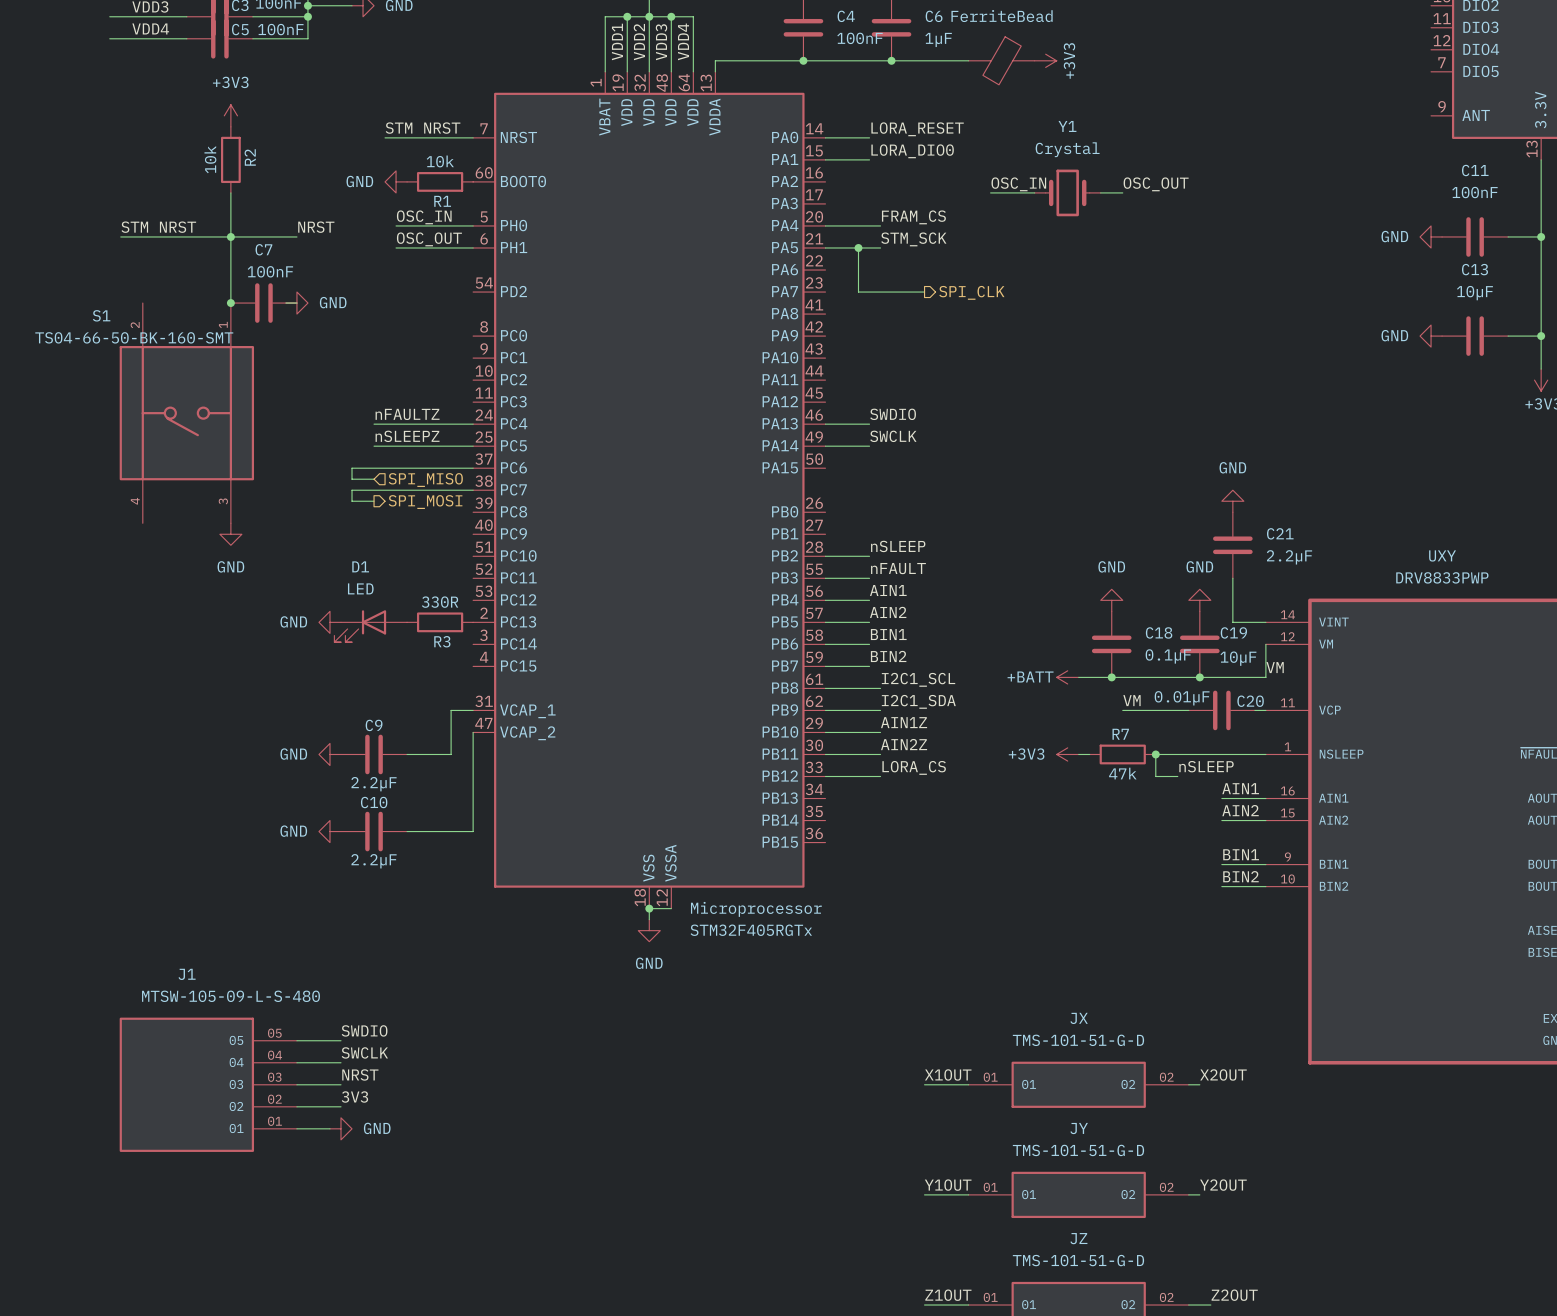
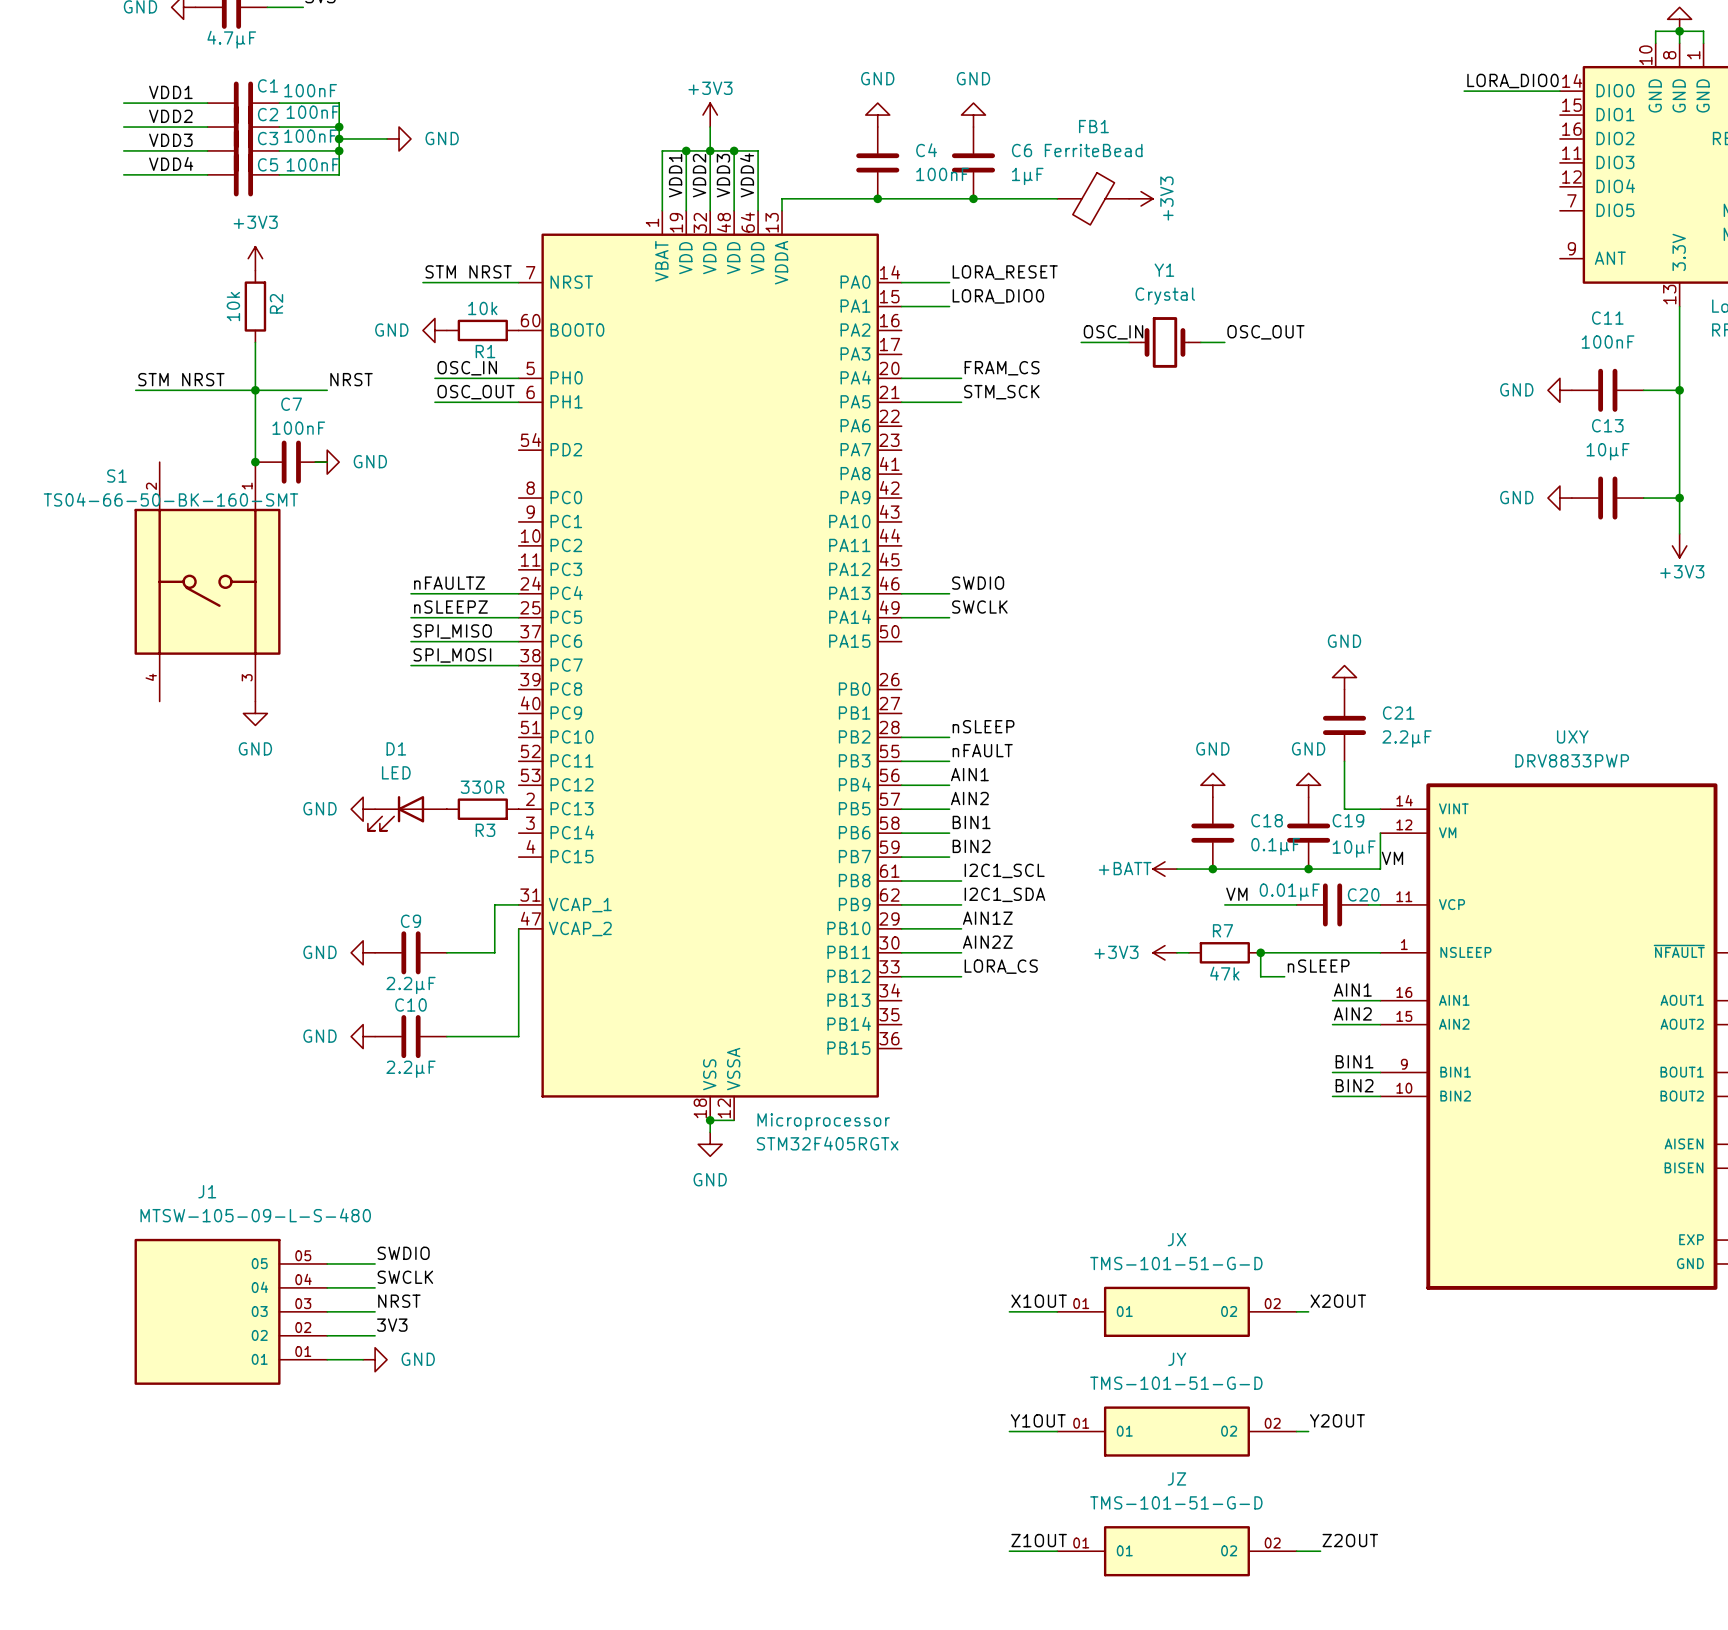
wire: (858, 247) (858, 292) (924, 292) -> none
junction: (858, 247) -> none
hierarchical label: SPI_CLK (971, 292) -> none
label: none -> SPI_MISO (452, 631)
wire: (374, 468) (352, 468) (352, 479) (374, 479) -> none
hierarchical label: SPI_MISO (425, 480) -> none
label: none -> SPI_MOSI (452, 655)
wire: (374, 490) (352, 490) (352, 501) (374, 501) -> none
hierarchical label: SPI_MOSI (425, 502) -> none

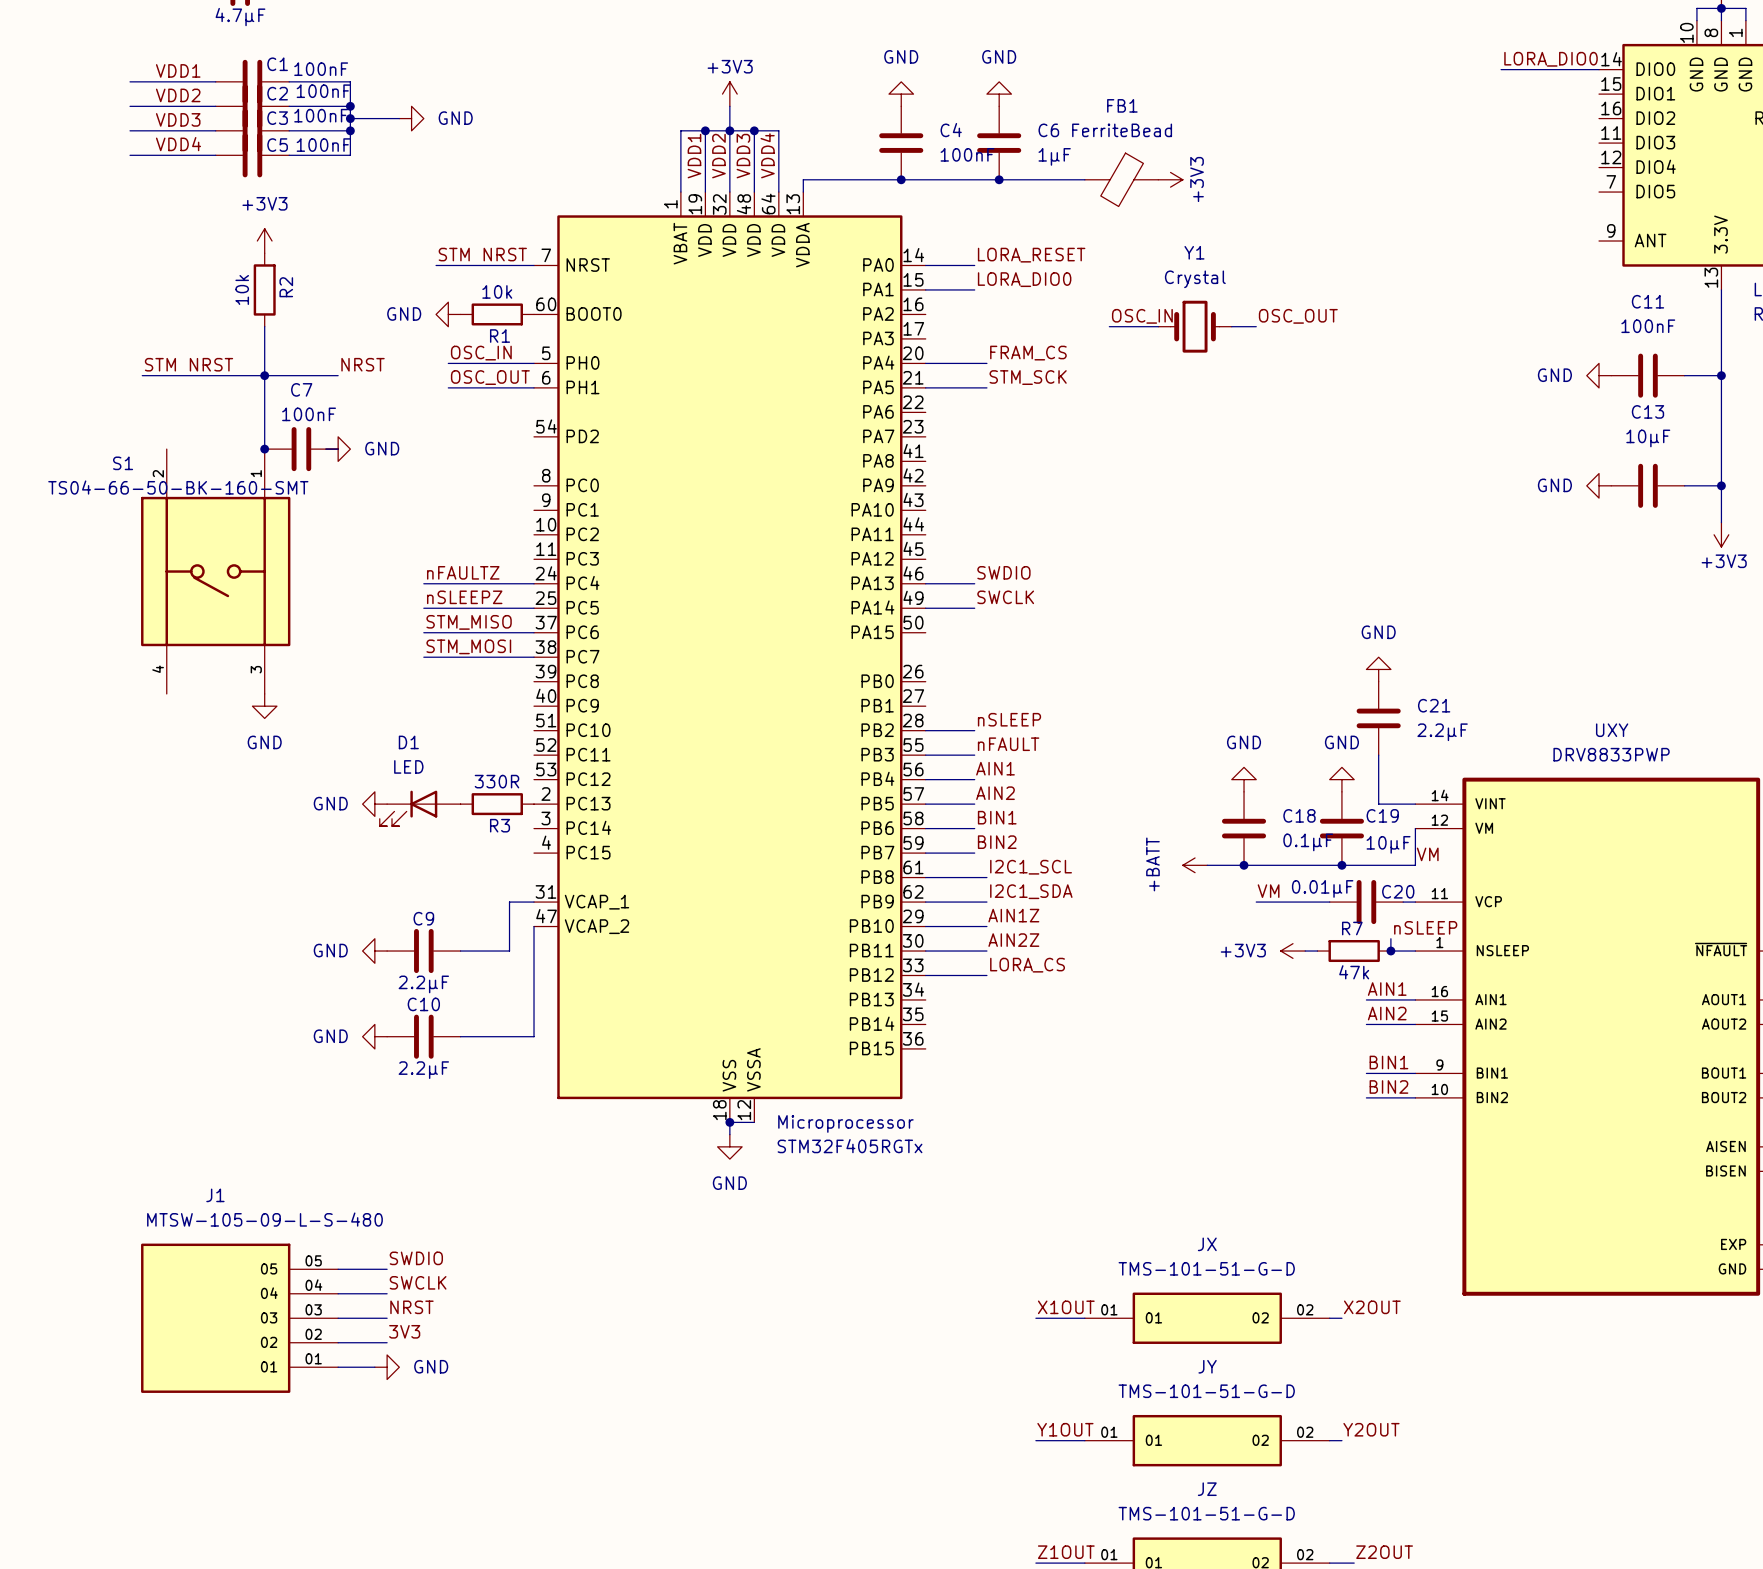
label: SPI_MISO (452, 631) -> STM_MISO (469, 622)
label: SPI_MOSI (452, 655) -> STM_MOSI (468, 646)
power symbol text rotation: 0° (1125, 868) -> 90° counterclockwise (1152, 864)
power symbol position: +3V3 (1164, 952) -> +3V3 (1292, 951)
wire: (1176, 952) (1188, 952) -> none
R7 position: (1224, 952) -> (1354, 951)
junction: (1260, 952) -> none
wire: (1272, 952) (1260, 952) (1260, 976) (1284, 976) -> none
wire: (1284, 952) (1356, 952) -> (1390, 938) (1390, 951)
junction: none -> (1390, 951)
label position: nSLEEP (1318, 966) -> nSLEEP (1425, 927)

